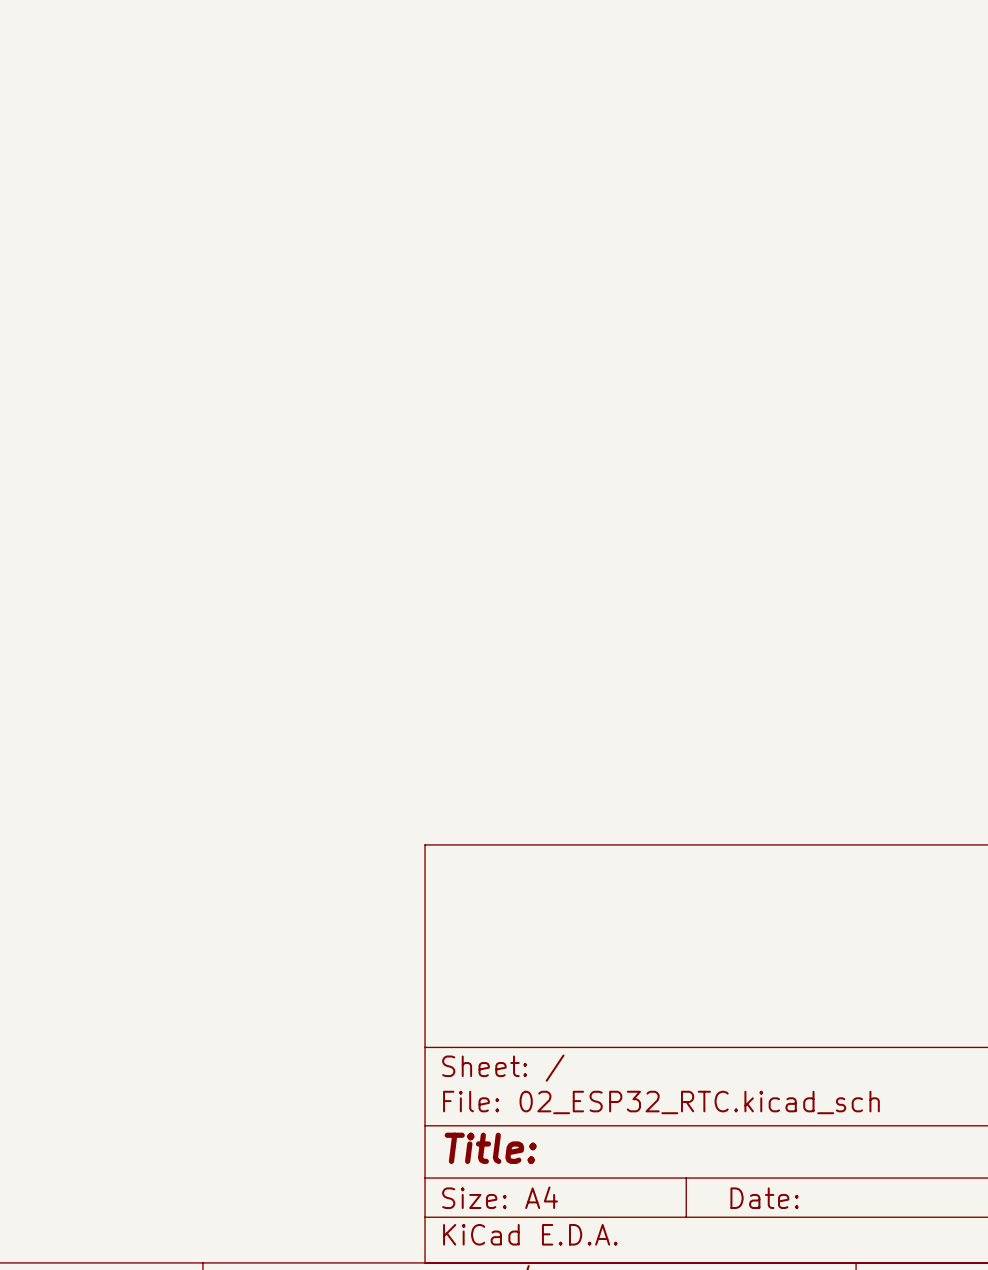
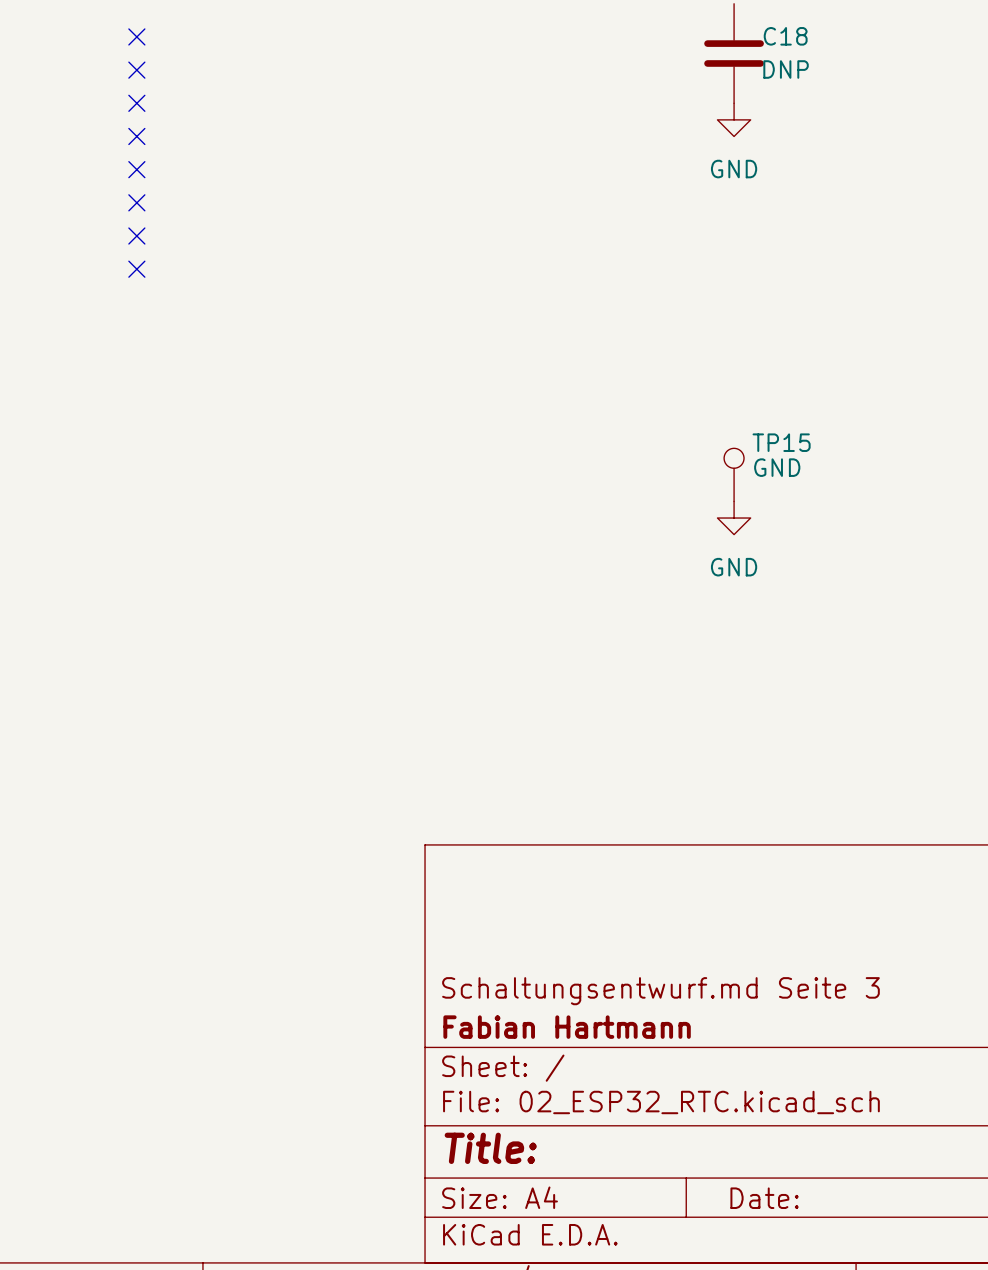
no-connect mark: none -> (136, 36)
C18: none -> DNP (734, 53)
no-connect mark: none -> (136, 70)
no-connect mark: none -> (136, 103)
power symbol: none -> GND (734, 119)
no-connect mark: none -> (136, 136)
no-connect mark: none -> (136, 169)
no-connect mark: none -> (136, 202)
no-connect mark: none -> (136, 236)
no-connect mark: none -> (136, 269)
TP15: none -> GND (734, 474)
power symbol: none -> GND (734, 518)
title block: none -> Schaltungsentwurf.md Seite 3 (660, 991)
title block: none -> Fabian Hartmann (567, 1027)

